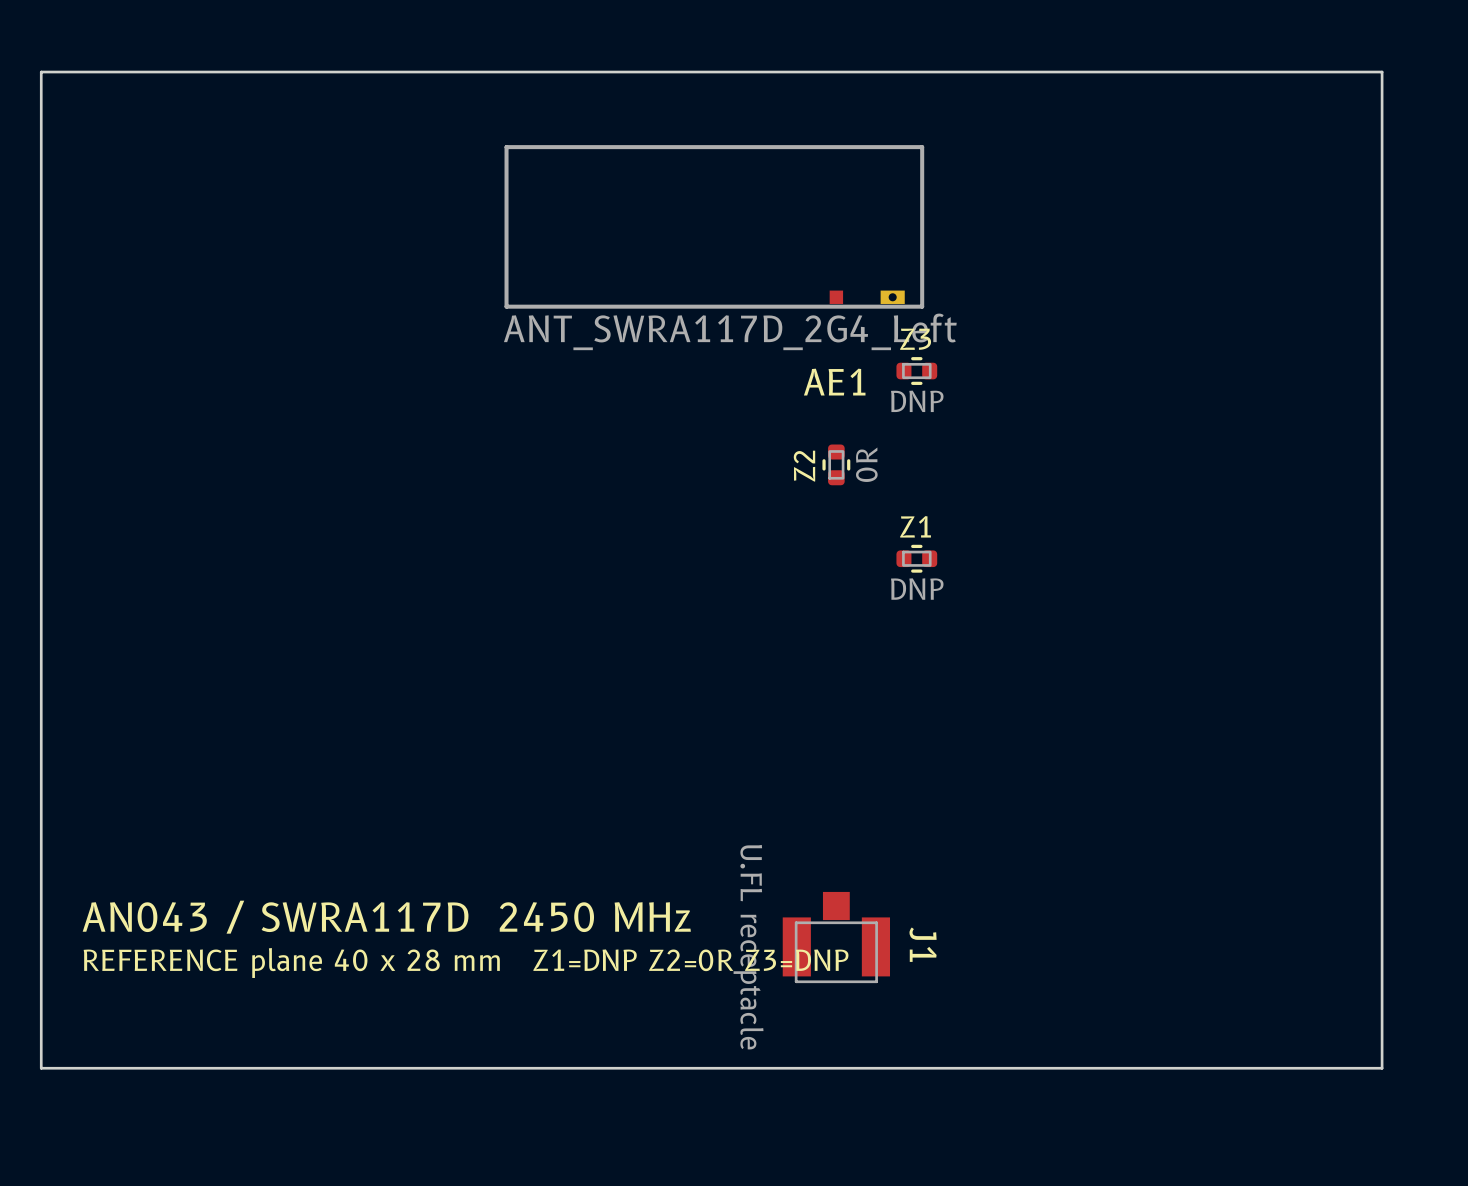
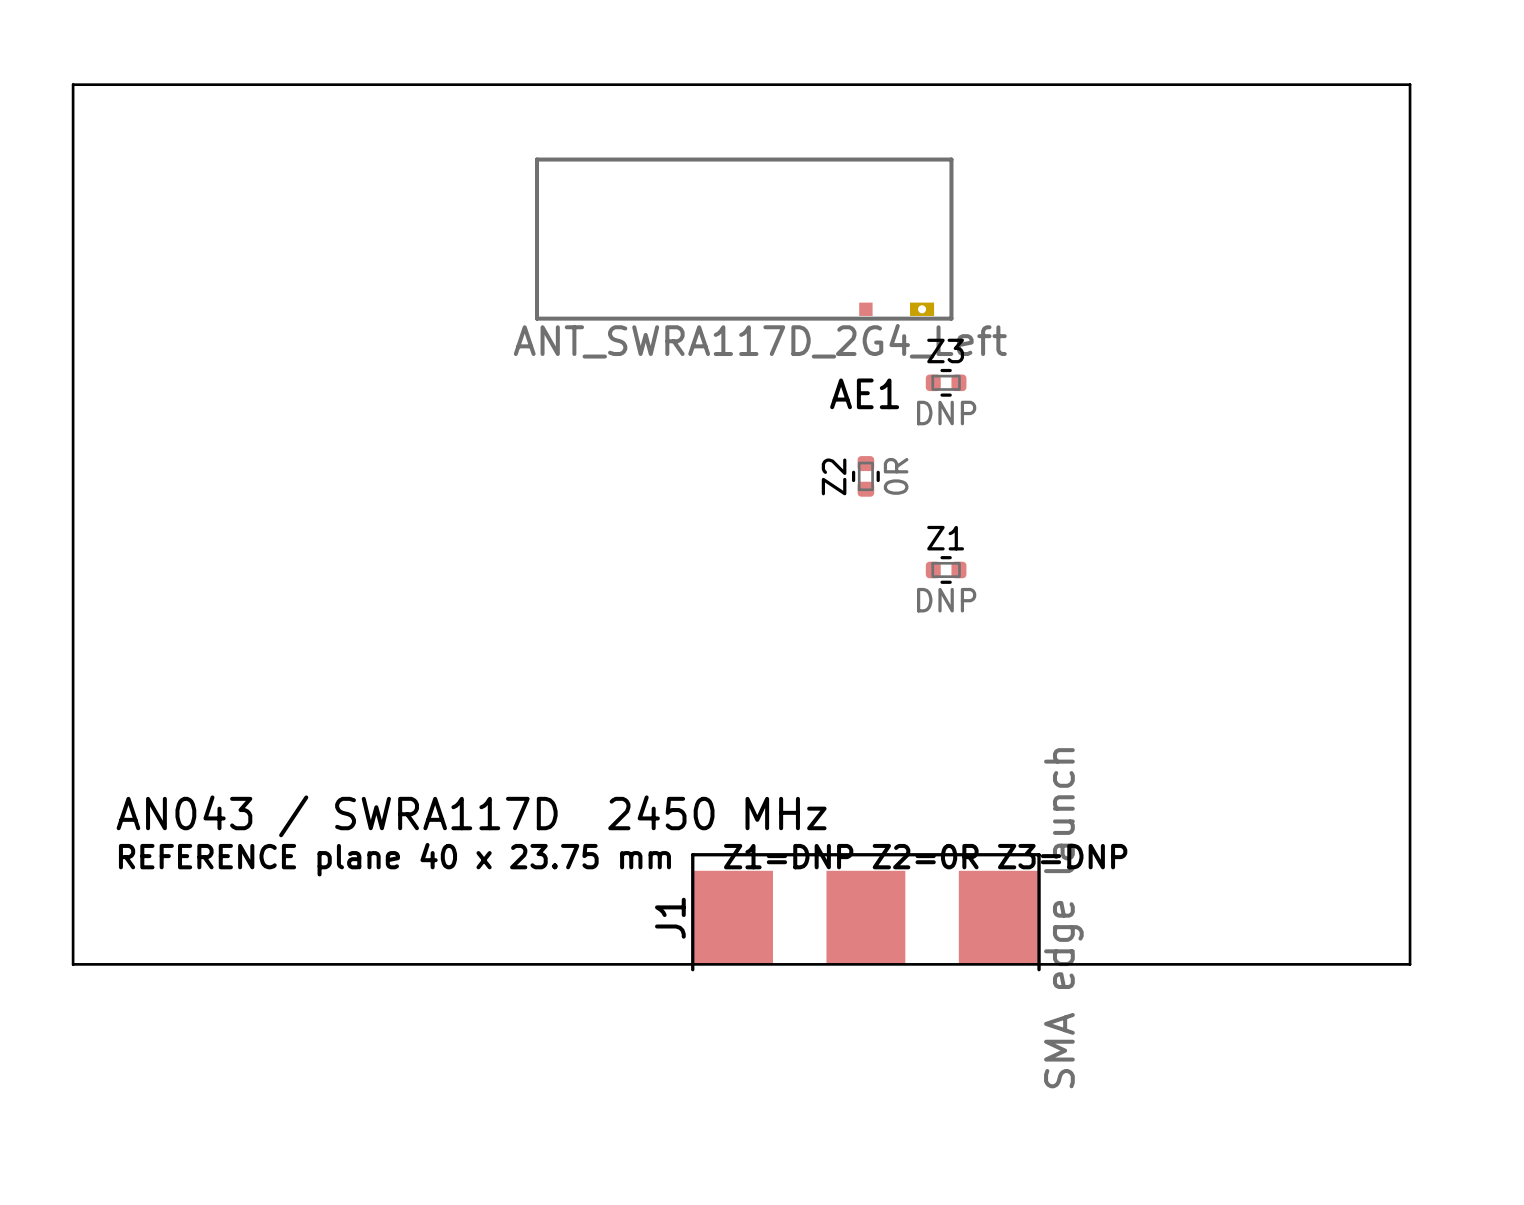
text: none -> REFERENCE plane 40 x 23.75 mm Z1=DNP Z2=0R Z3=DNP (623, 859)
J1 footprint: [782, 891, 891, 984] -> [691, 853, 1041, 972]
text position: AN043 / SWRA117D 2450 MHz (386, 917) -> AN043 / SWRA117D 2450 MHz (471, 816)
J1 name position: J1 (923, 944) -> J1 (670, 918)
J1 value: U.FL receptacle (748, 947) -> SMA edge launch (1063, 918)
board edge: (41, 954) (41, 1068) (1382, 1068) (1382, 954) -> (73, 964) (1410, 964)
text: REFERENCE plane 40 x 28 mm Z1=DNP Z2=0R Z3=DNP (466, 963) -> none

